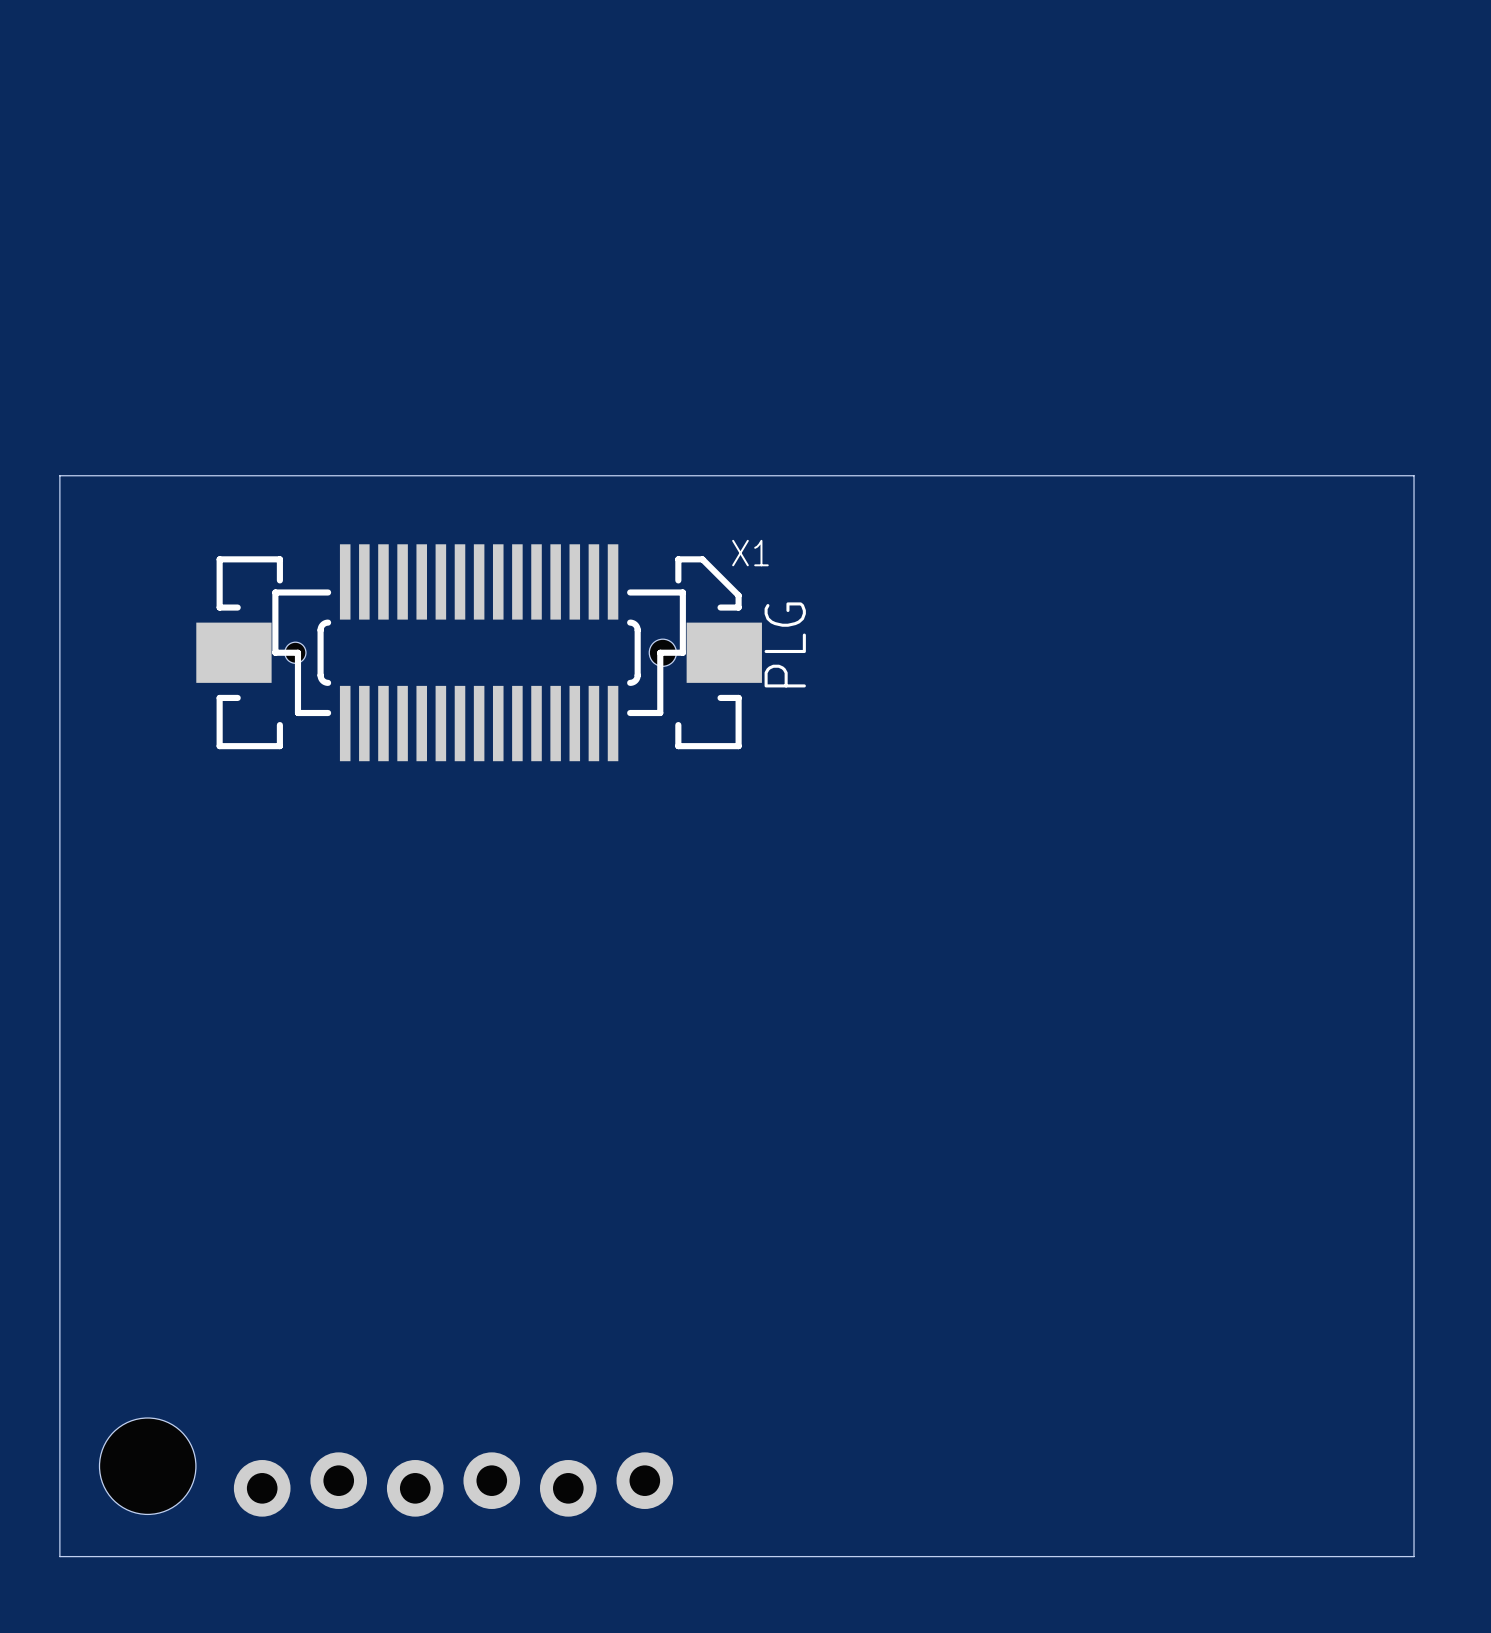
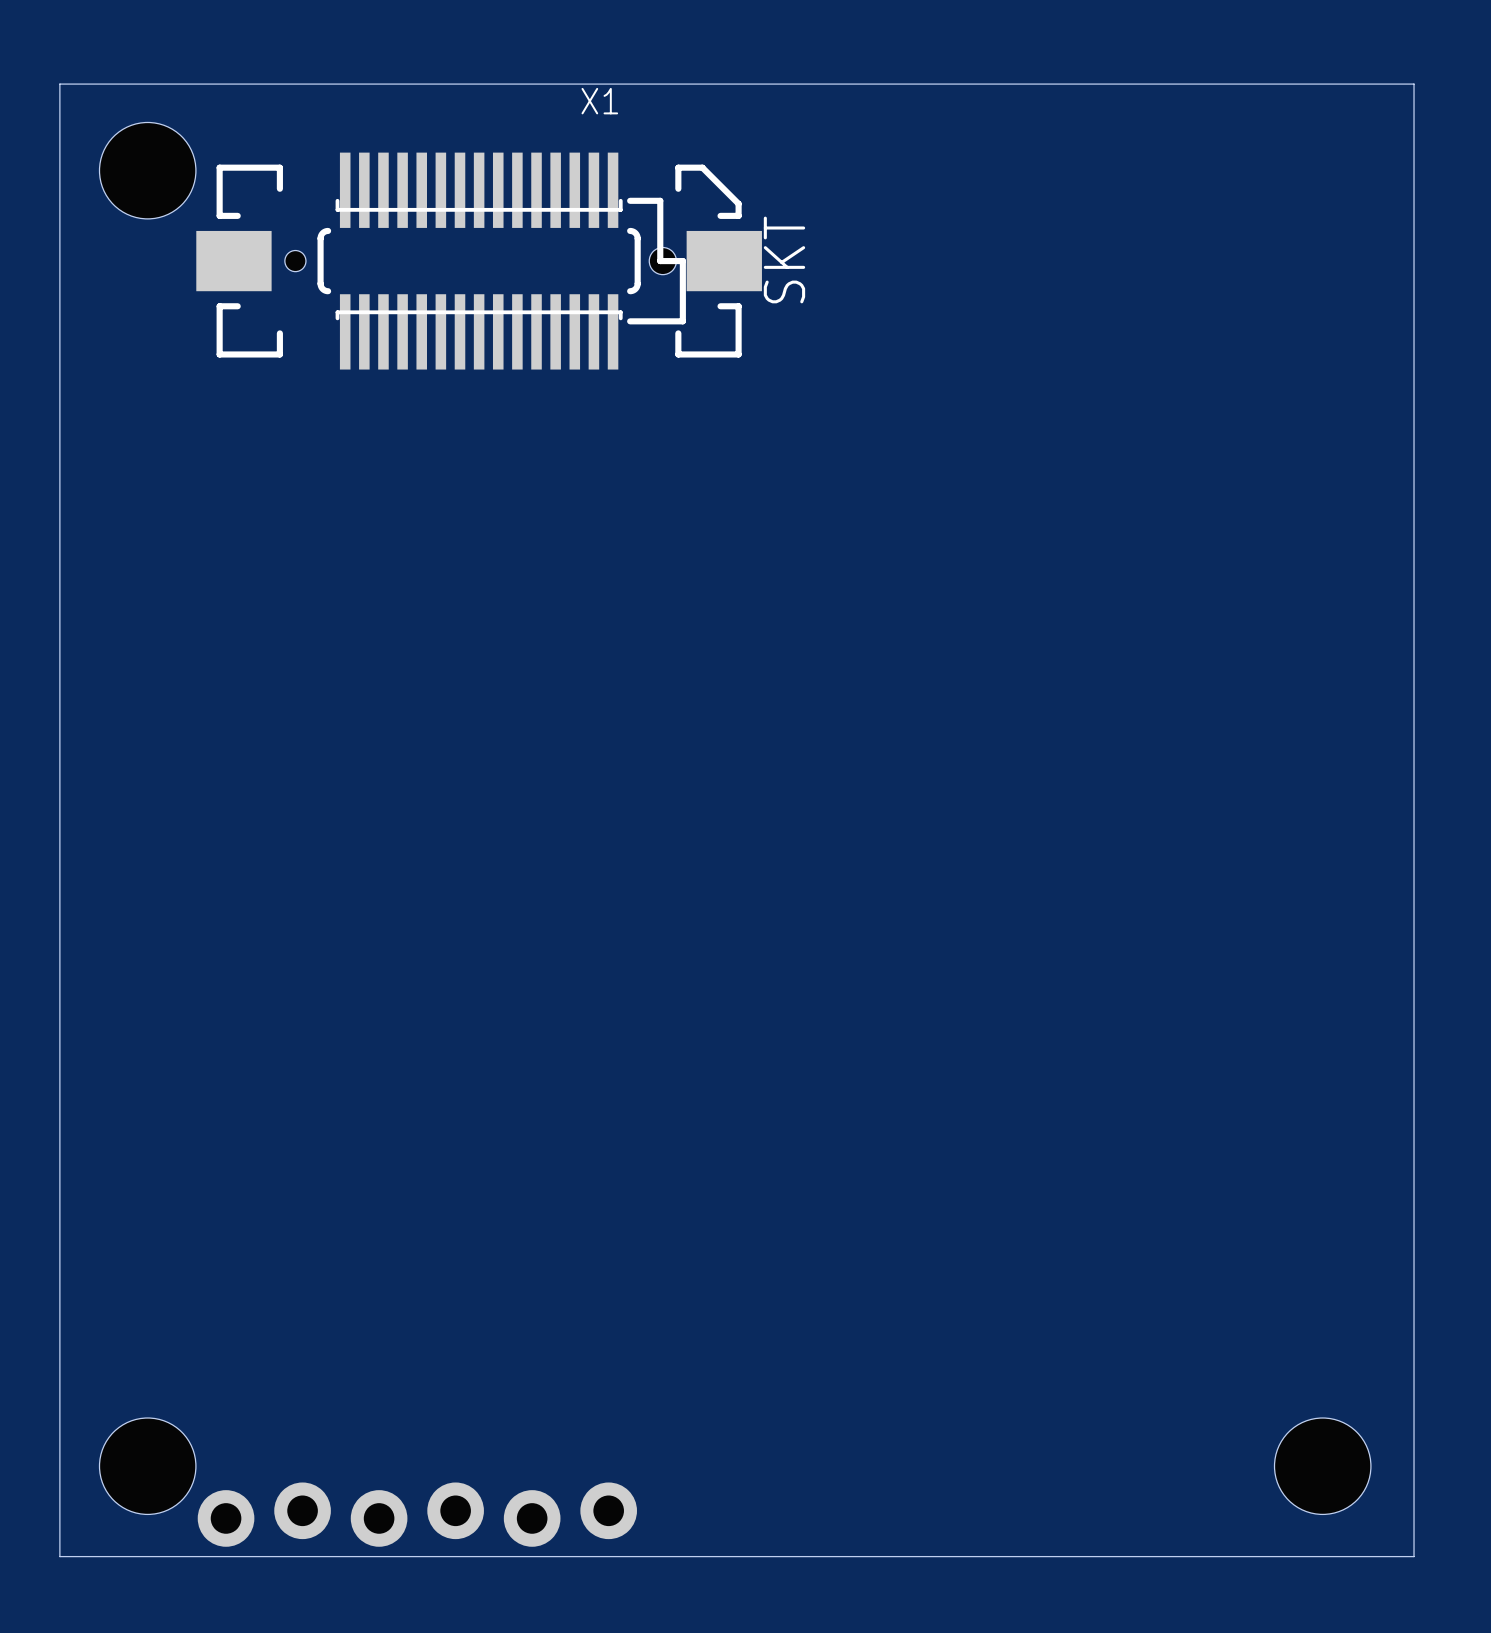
hole: none -> (147, 170)
board edge: (1414, 475) (59, 475) -> (1414, 475) (1414, 84) (59, 84) (59, 475)
X1 footprint: [196, 544, 762, 762] -> [196, 152, 762, 370]
X1 name position: X1 (750, 553) -> X1 (599, 101)
hole: none -> (1322, 1466)
part position: (453, 1484) -> (417, 1514)

